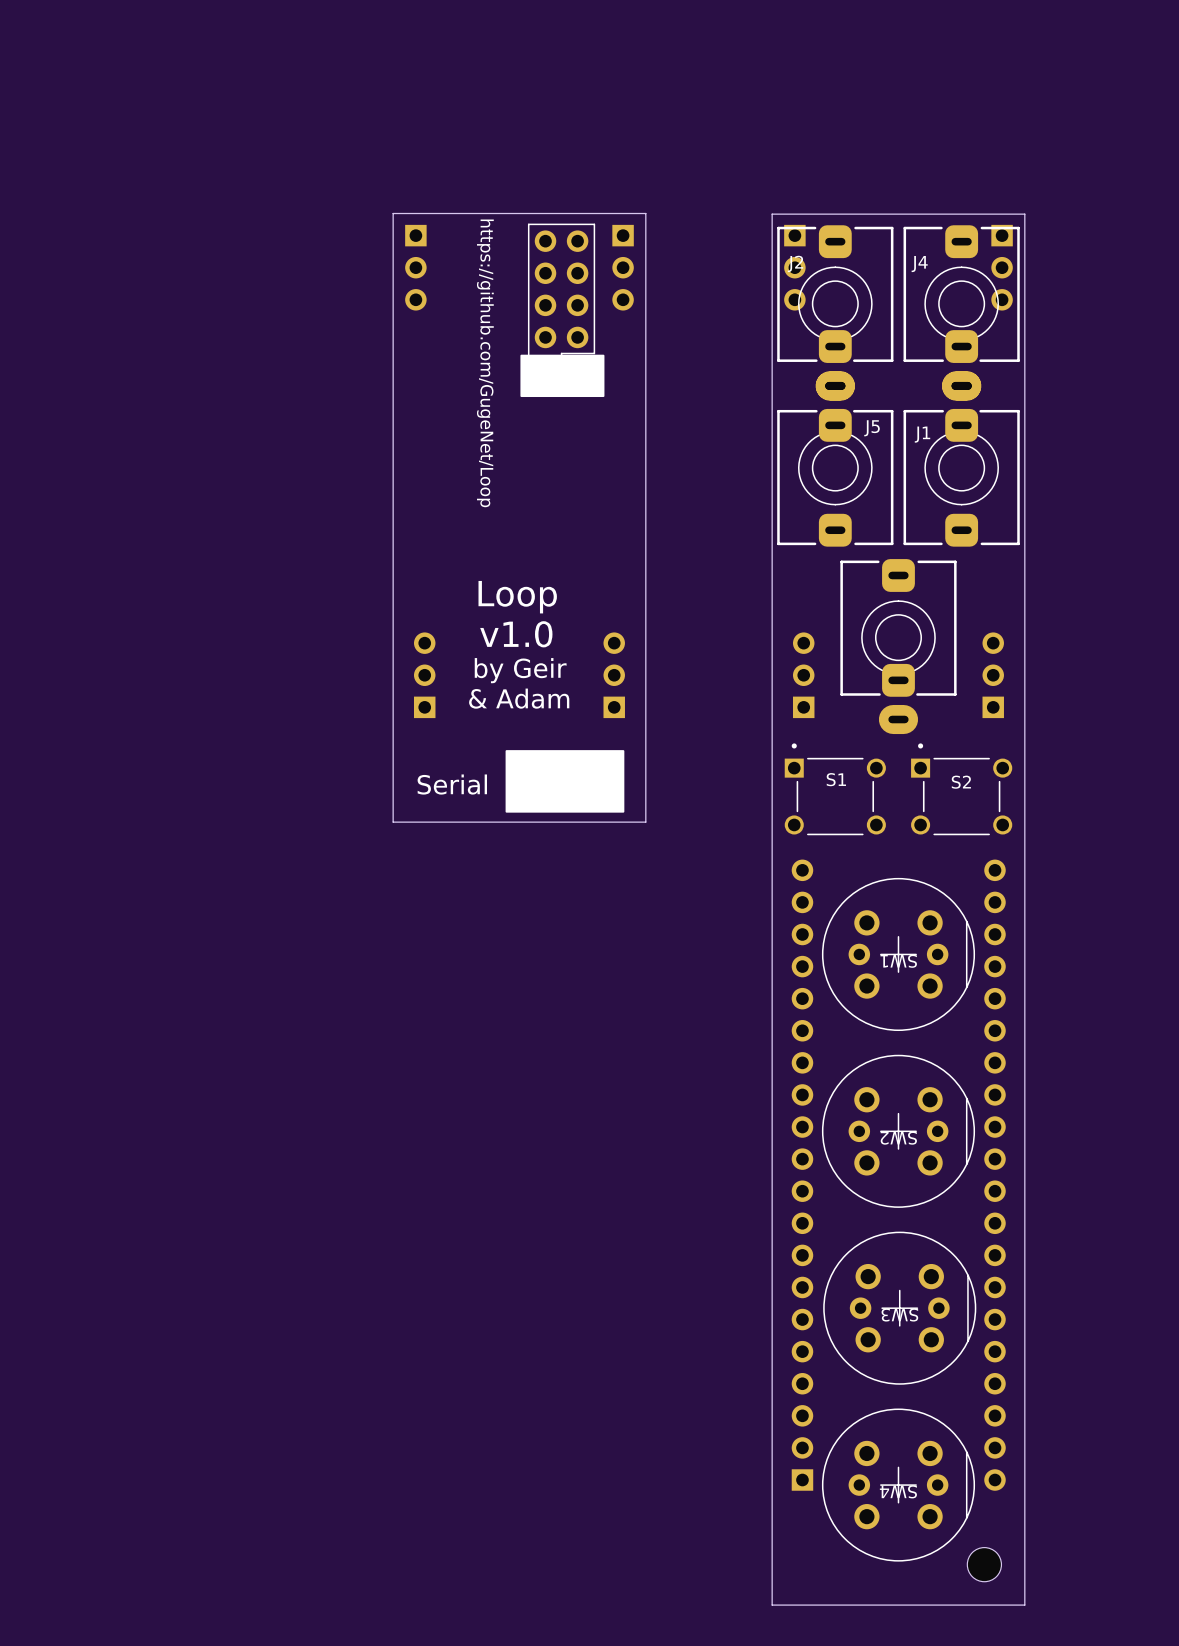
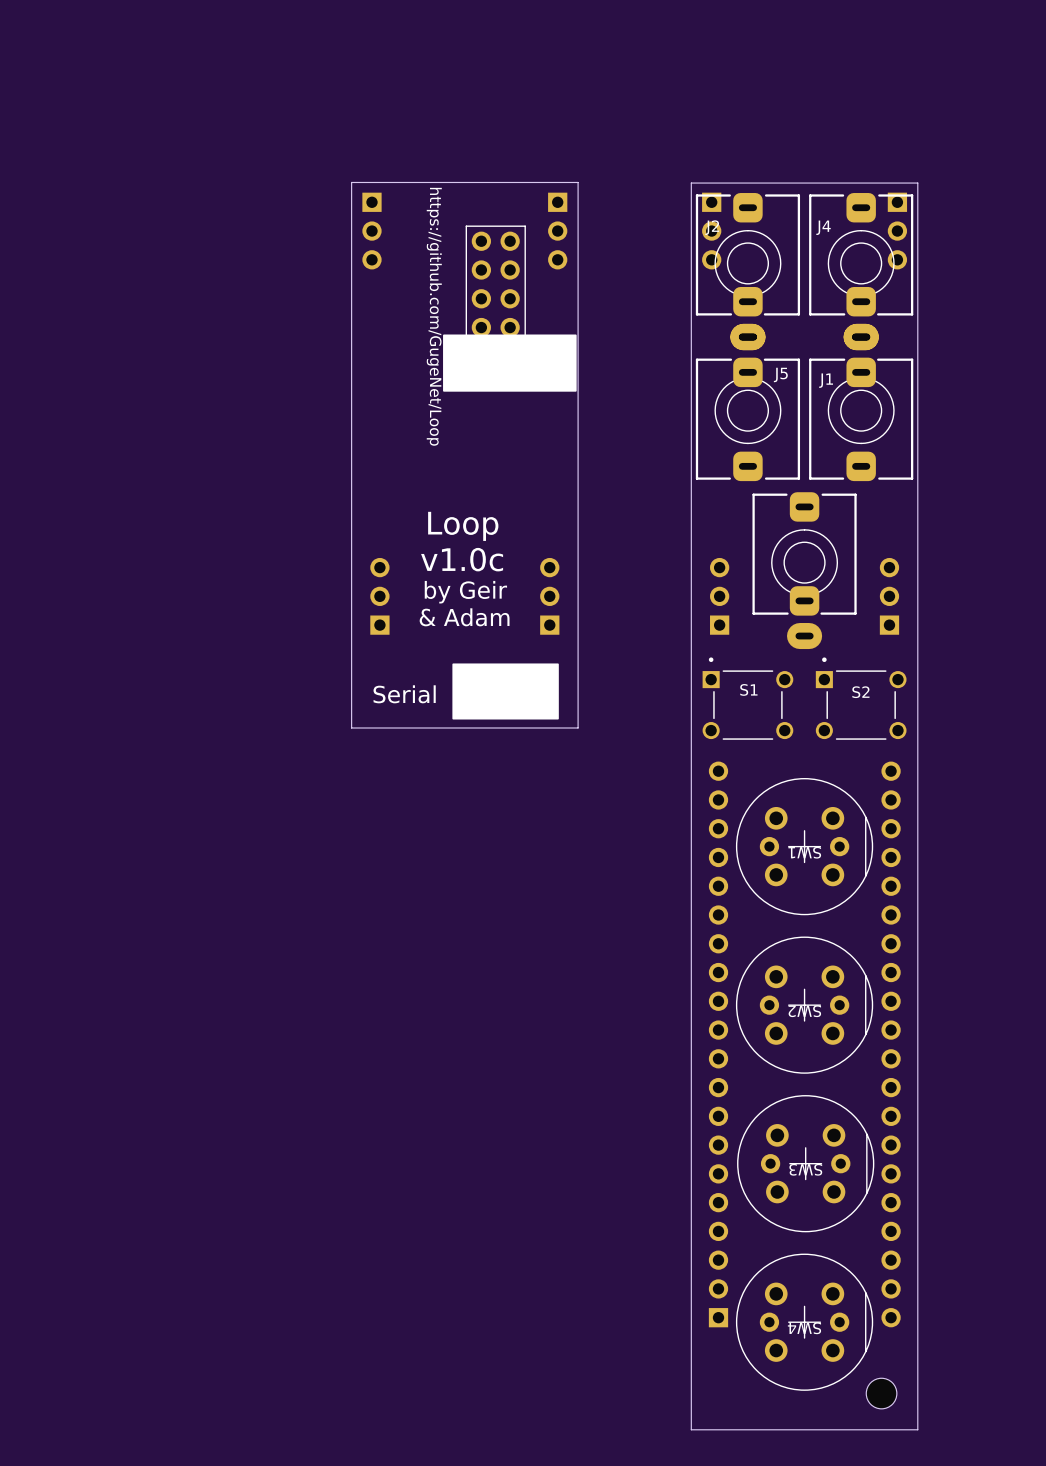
part position: (561, 305) -> (495, 298)
drawing: [520, 354, 605, 398] -> none
drawing: none -> [443, 334, 577, 392]
text: v1.0 (516, 634) -> v1.0c (462, 559)

